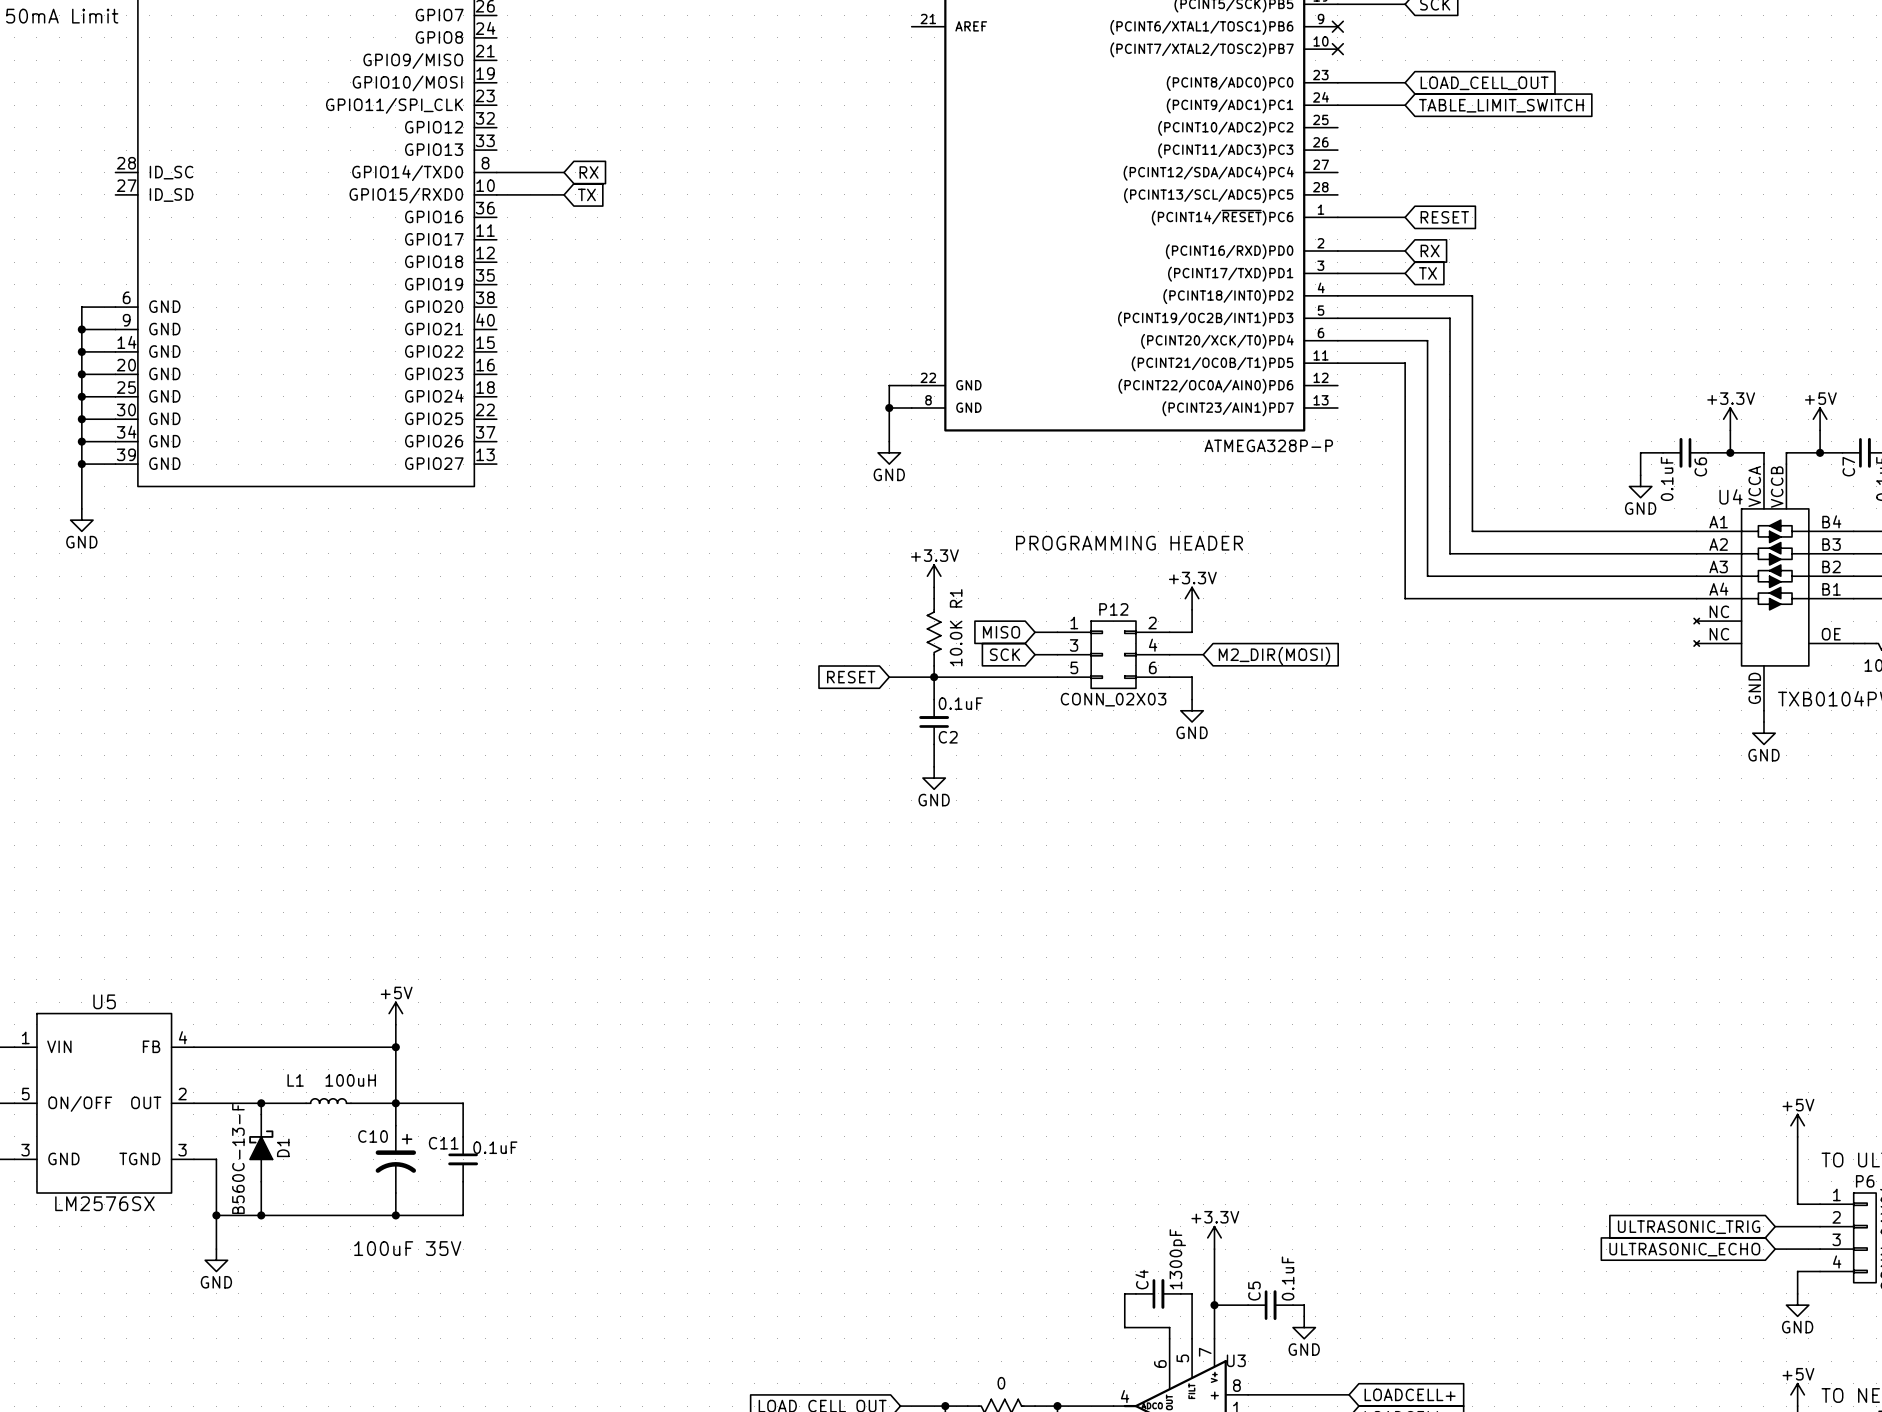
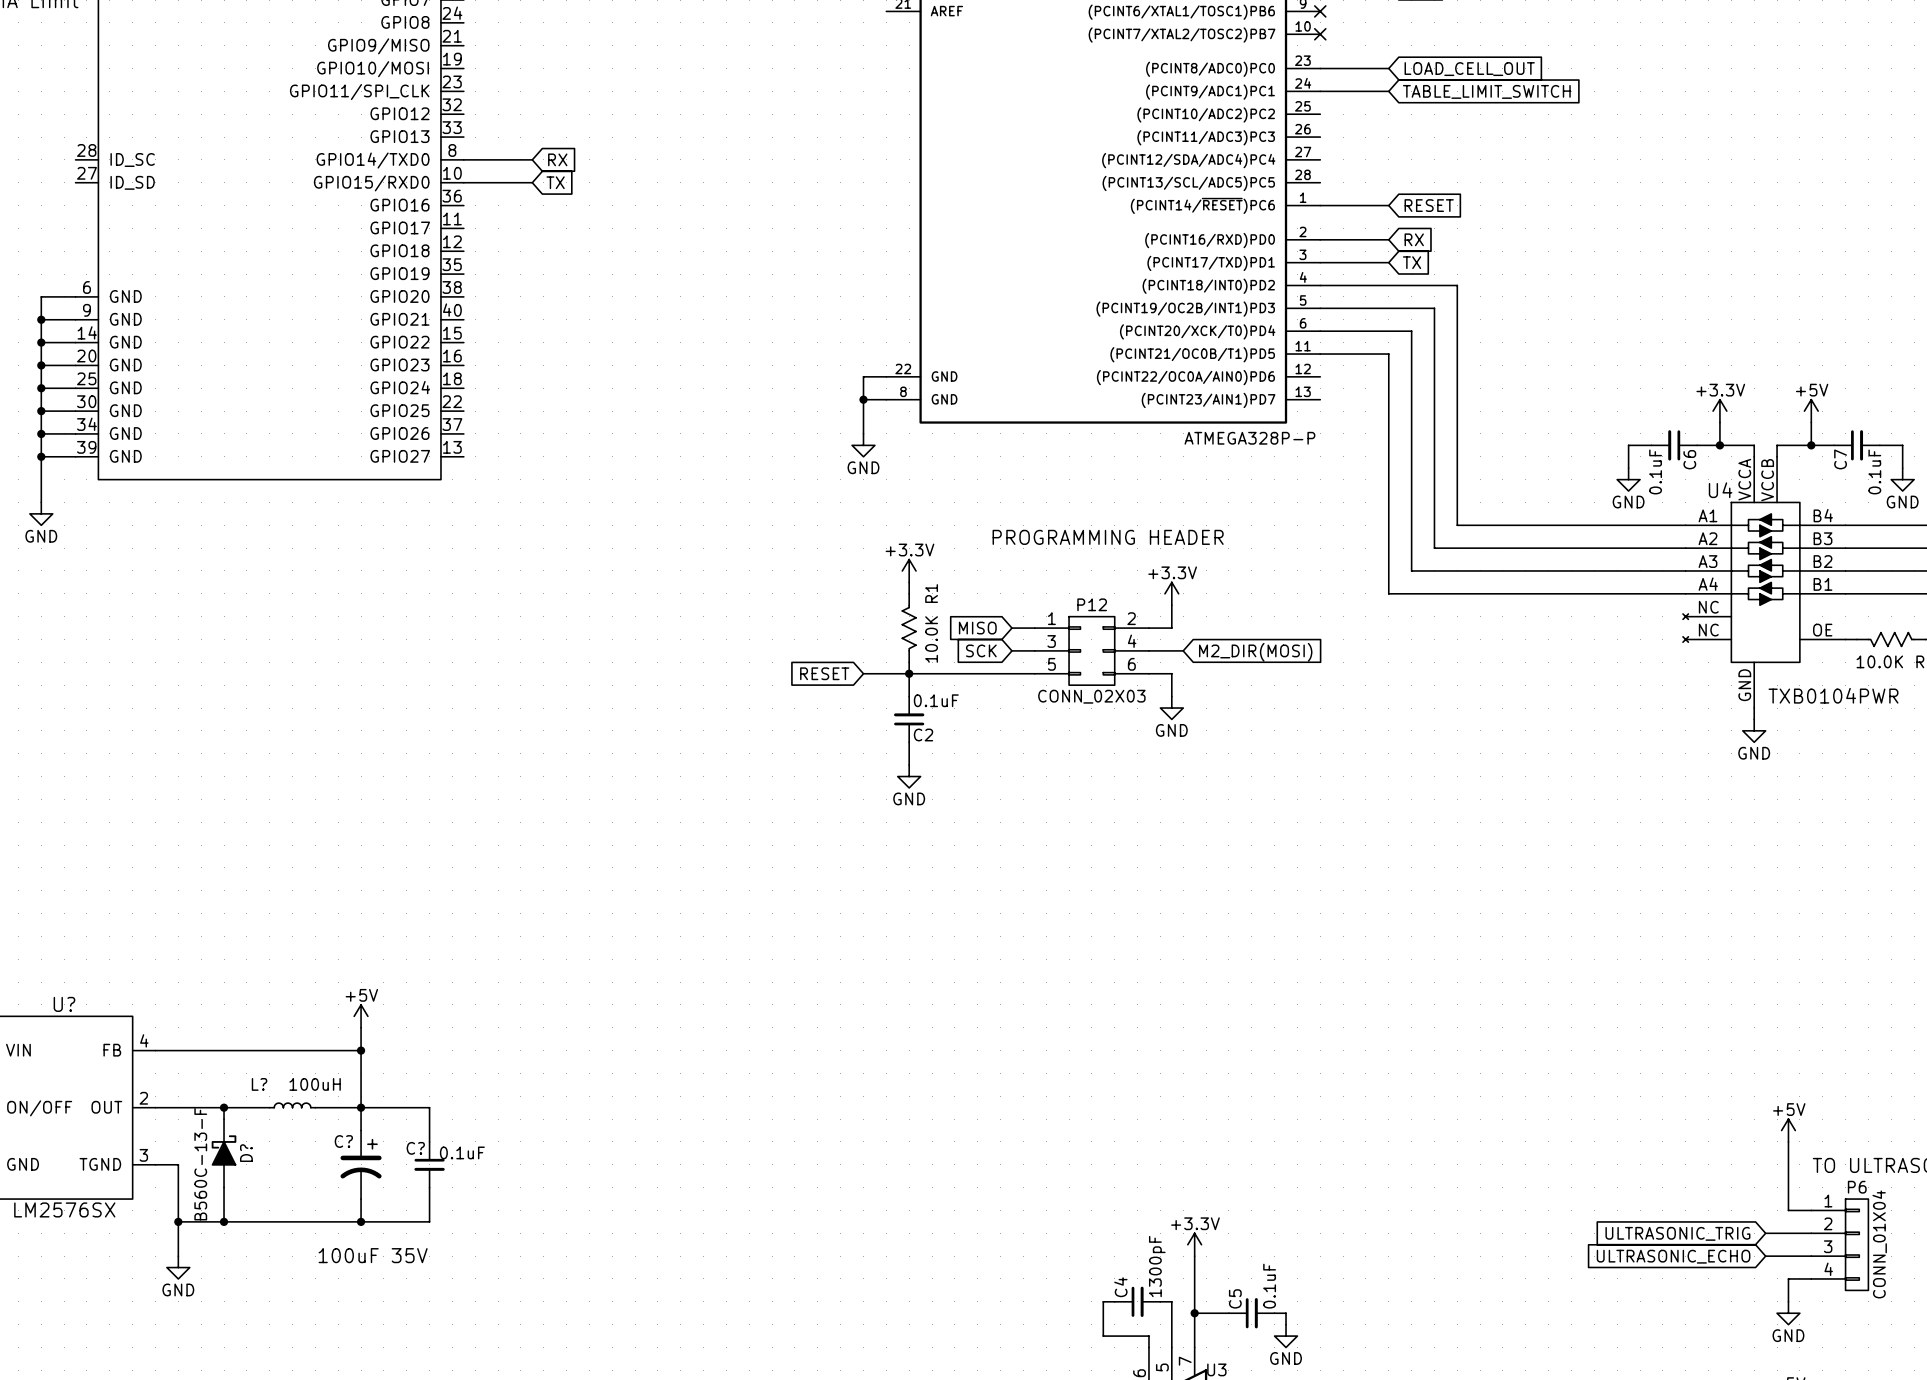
U5 name: U5 (104, 1001) -> U? (64, 1004)
L1 name: L1 (295, 1080) -> L? (259, 1084)
C10 name: C10 (373, 1136) -> C? (343, 1141)
C11 name: C11 (443, 1143) -> C? (415, 1148)
D1 name: D1 (283, 1147) -> D? (246, 1153)

